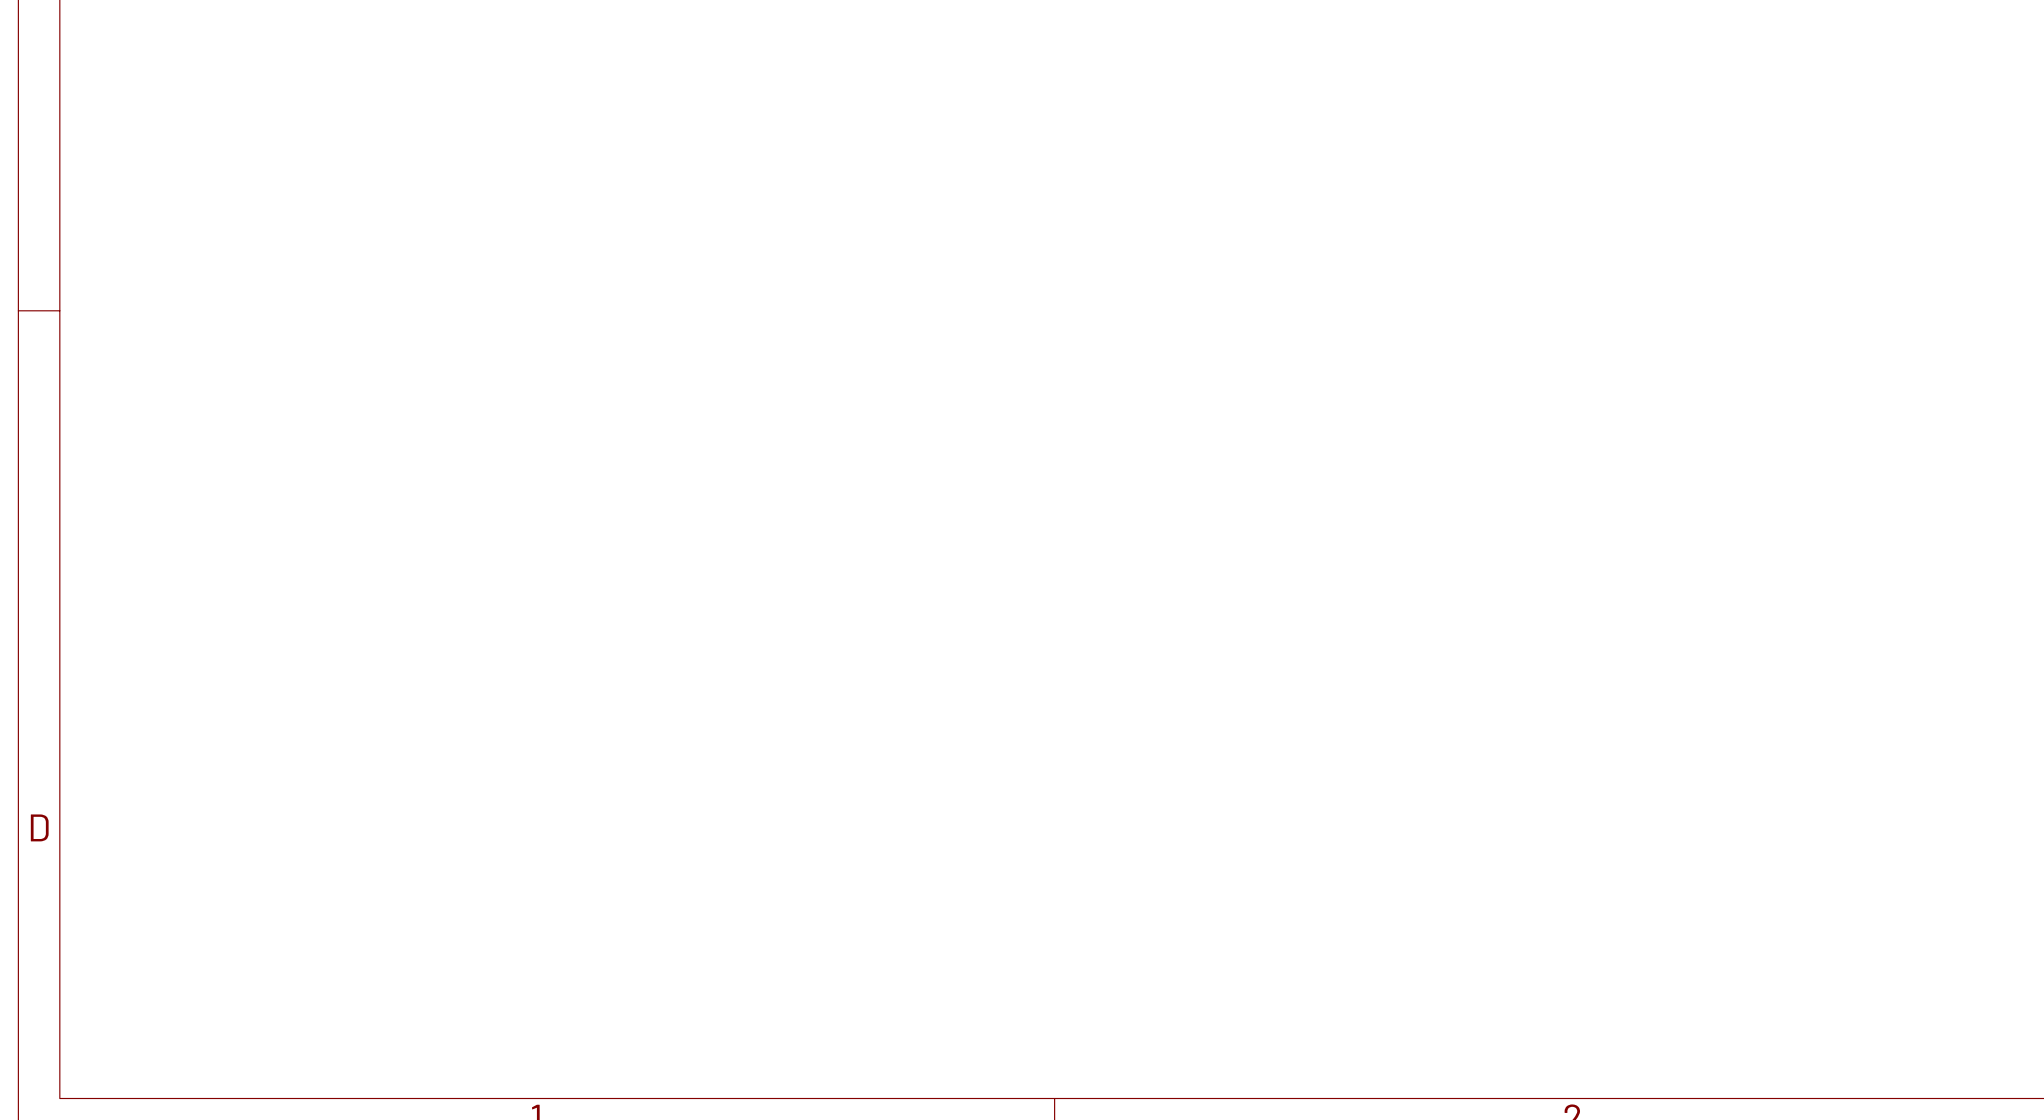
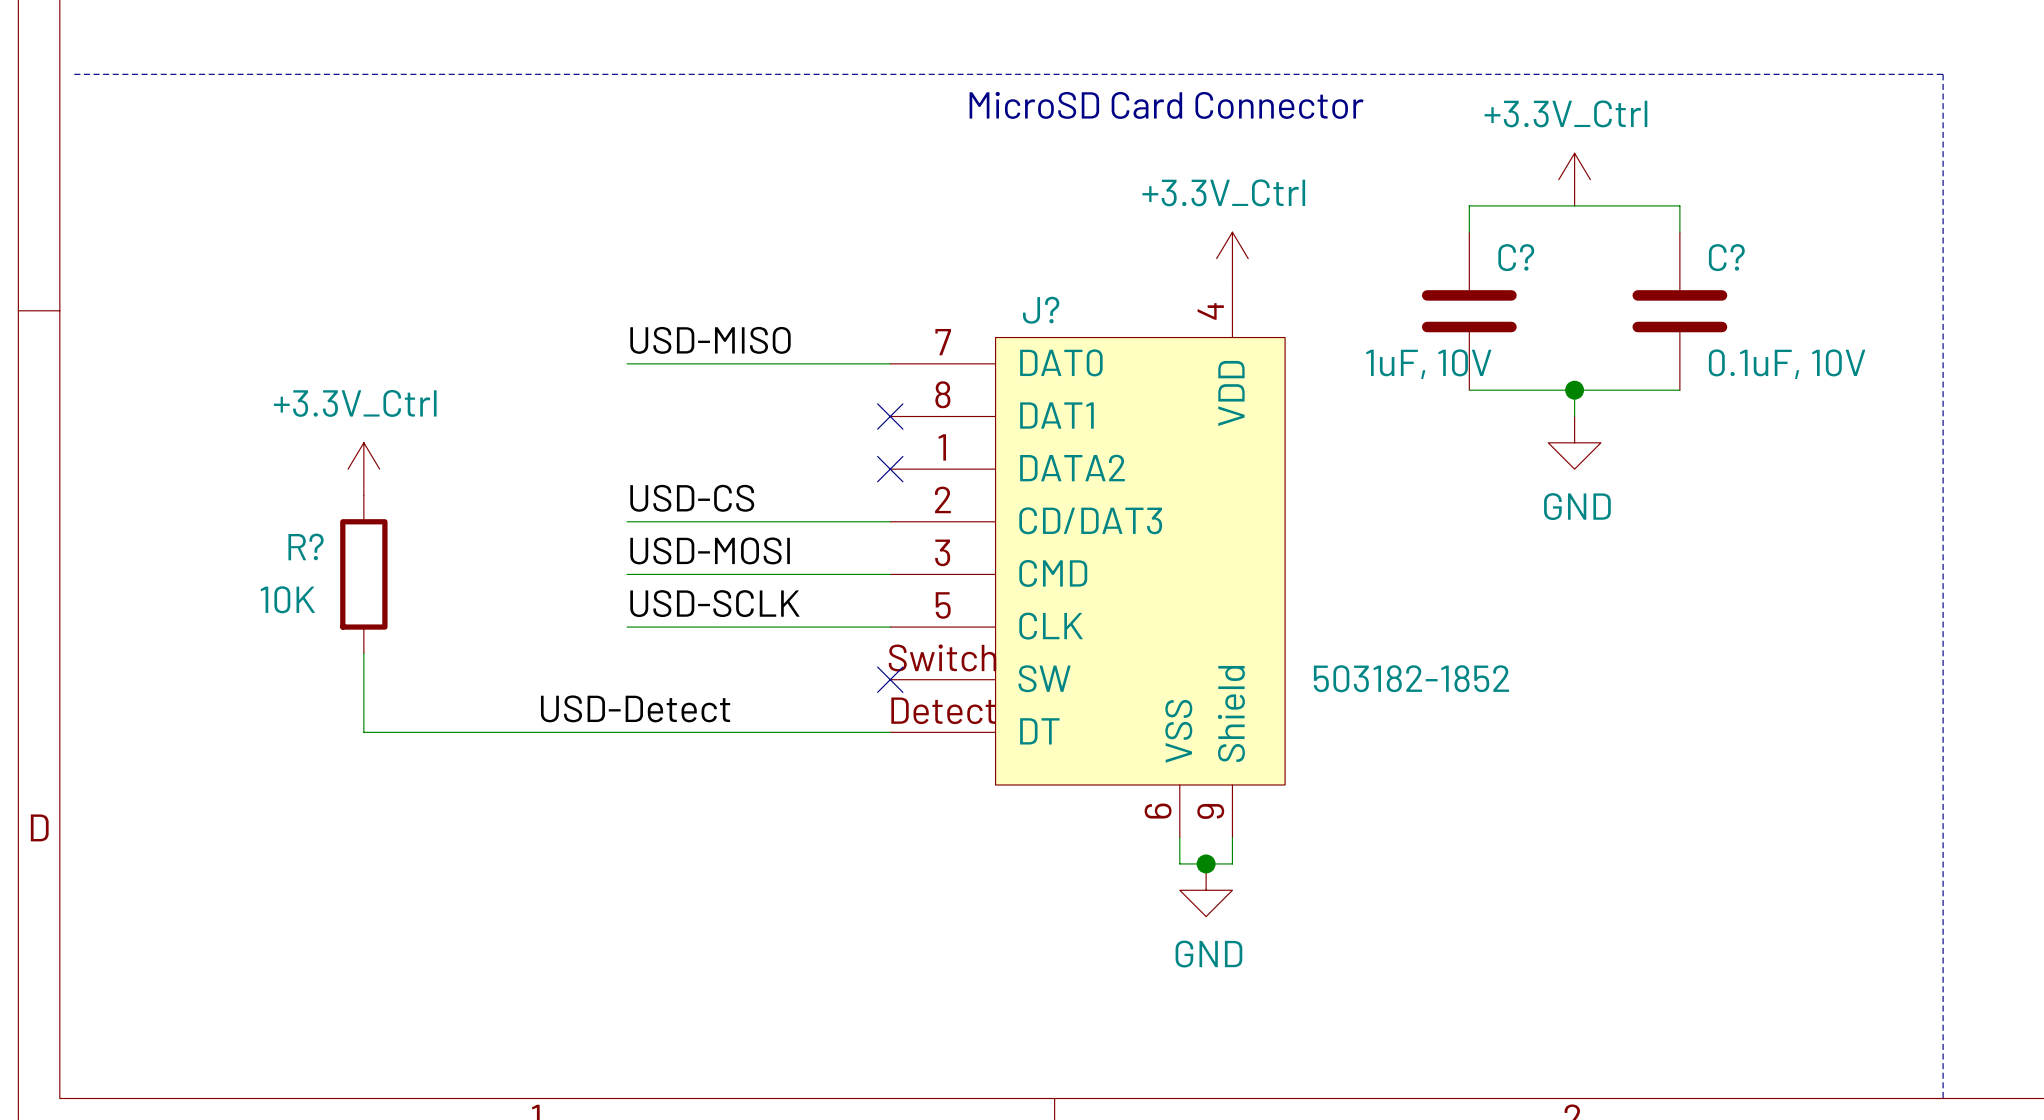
line: none -> (74, 74) (1943, 74) (1943, 1100)
text: none -> MicroSD Card Connector (1166, 105)
power symbol: none -> +3.3V_Ctrl (1574, 179)
wire: none -> (1469, 232) (1469, 205) (1679, 205) (1679, 232)
power symbol: none -> +3.3V_Ctrl (1232, 258)
C?: none -> 1uF, 10V (1469, 311)
C?: none -> 0.1uF, 10V (1679, 311)
label: none -> USD-MISO (710, 340)
wire: none -> (627, 363) (890, 363)
wire: none -> (1469, 390) (1679, 390)
wire: none -> (1574, 390) (1574, 416)
junction: none -> (1574, 390)
no-connect mark: none -> (890, 416)
power symbol: none -> GND (1574, 442)
power symbol: none -> +3.3V_Ctrl (363, 469)
no-connect mark: none -> (890, 469)
label: none -> USD-CS (692, 498)
wire: none -> (627, 521) (890, 521)
label: none -> USD-MOSI (710, 550)
J?: none -> 503182-1852 (1087, 561)
R?: none -> 10K (363, 574)
wire: none -> (627, 574) (890, 574)
label: none -> USD-SCLK (714, 603)
wire: none -> (627, 627) (890, 627)
wire: none -> (363, 653) (363, 732) (890, 732)
no-connect mark: none -> (890, 679)
label: none -> USD-Detect (635, 708)
wire: none -> (1179, 837) (1179, 863) (1232, 863) (1232, 837)
junction: none -> (1206, 863)
power symbol: none -> GND (1206, 890)

